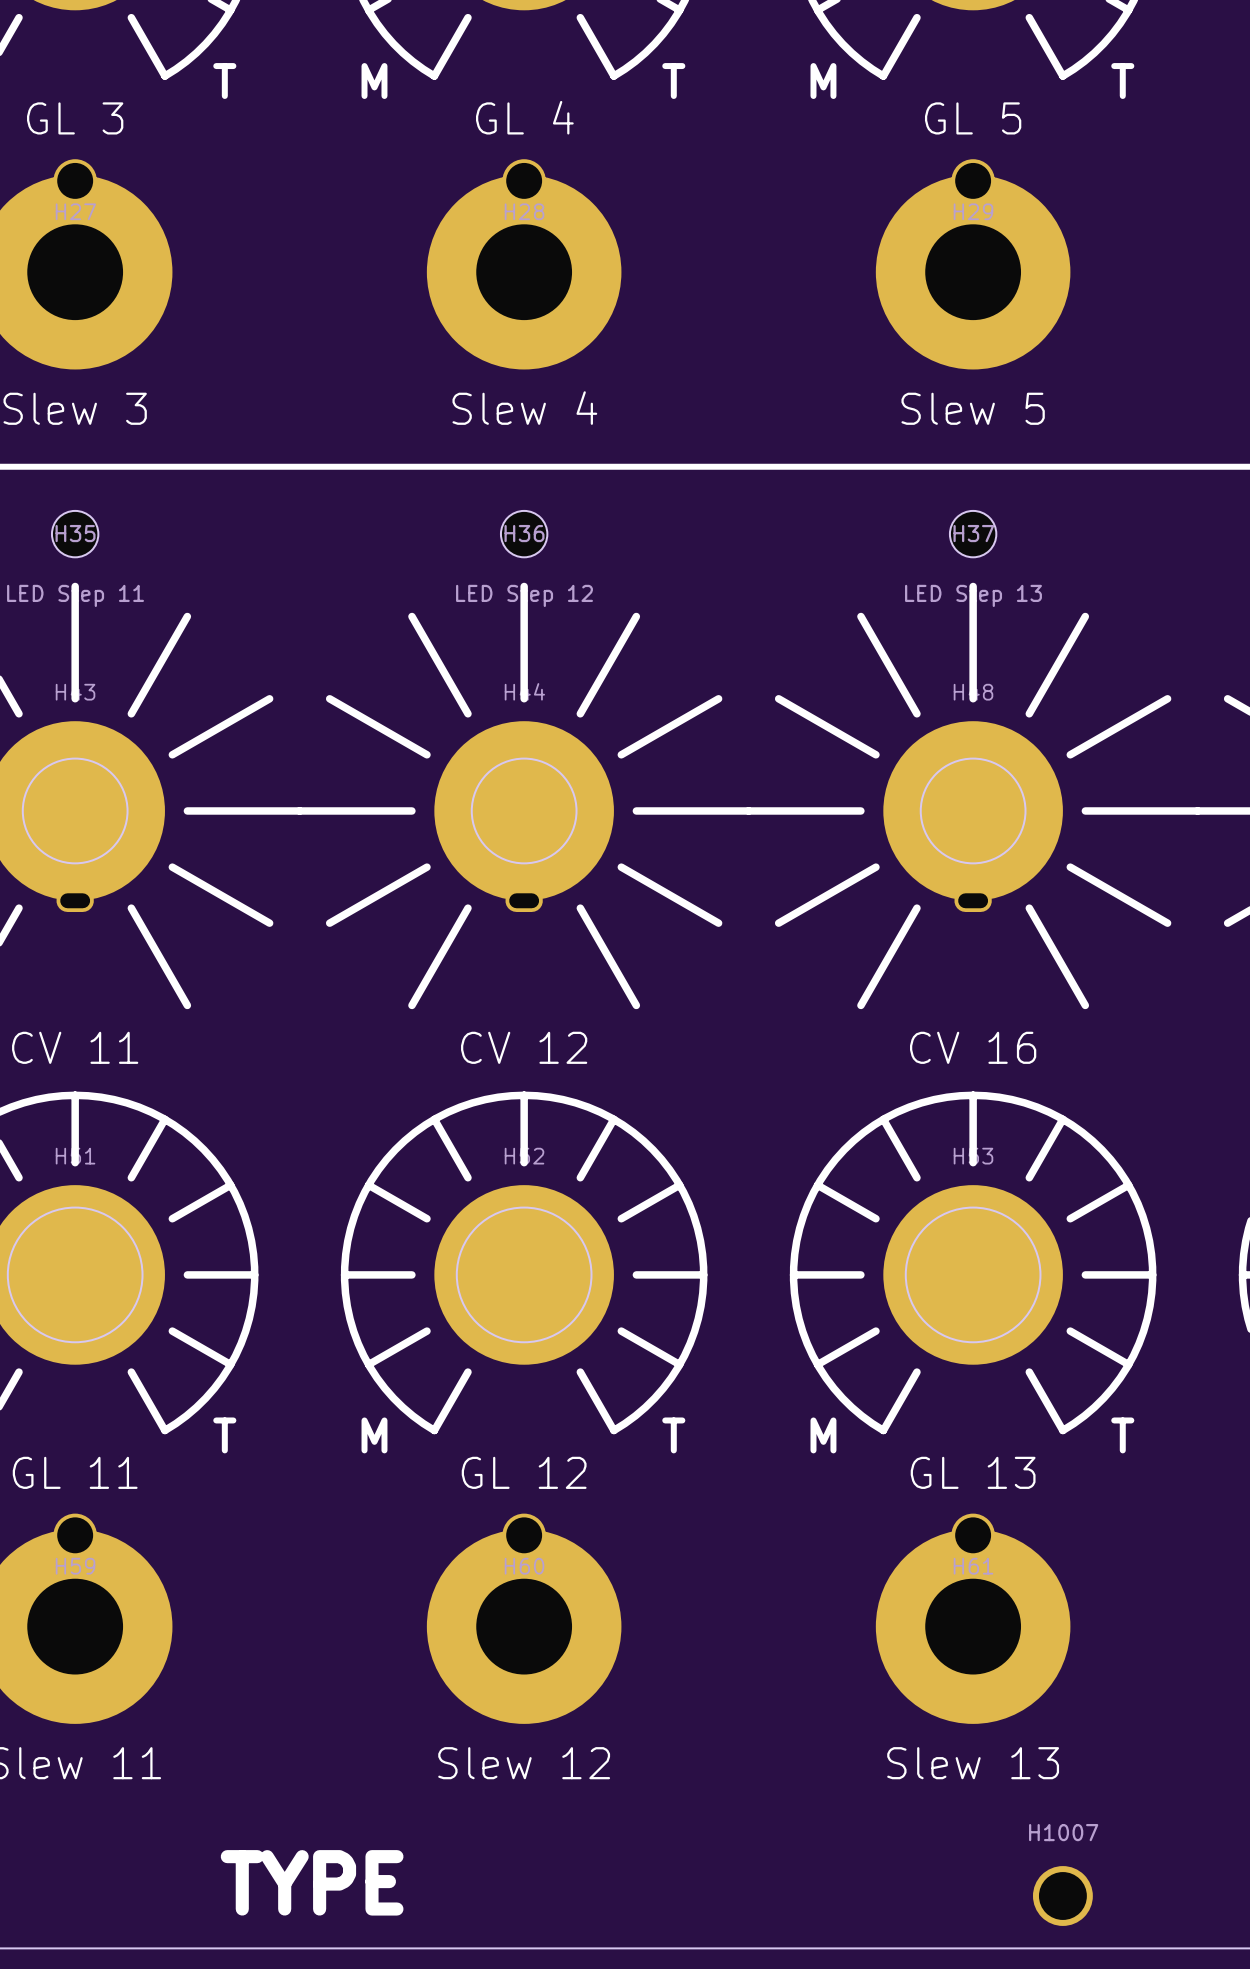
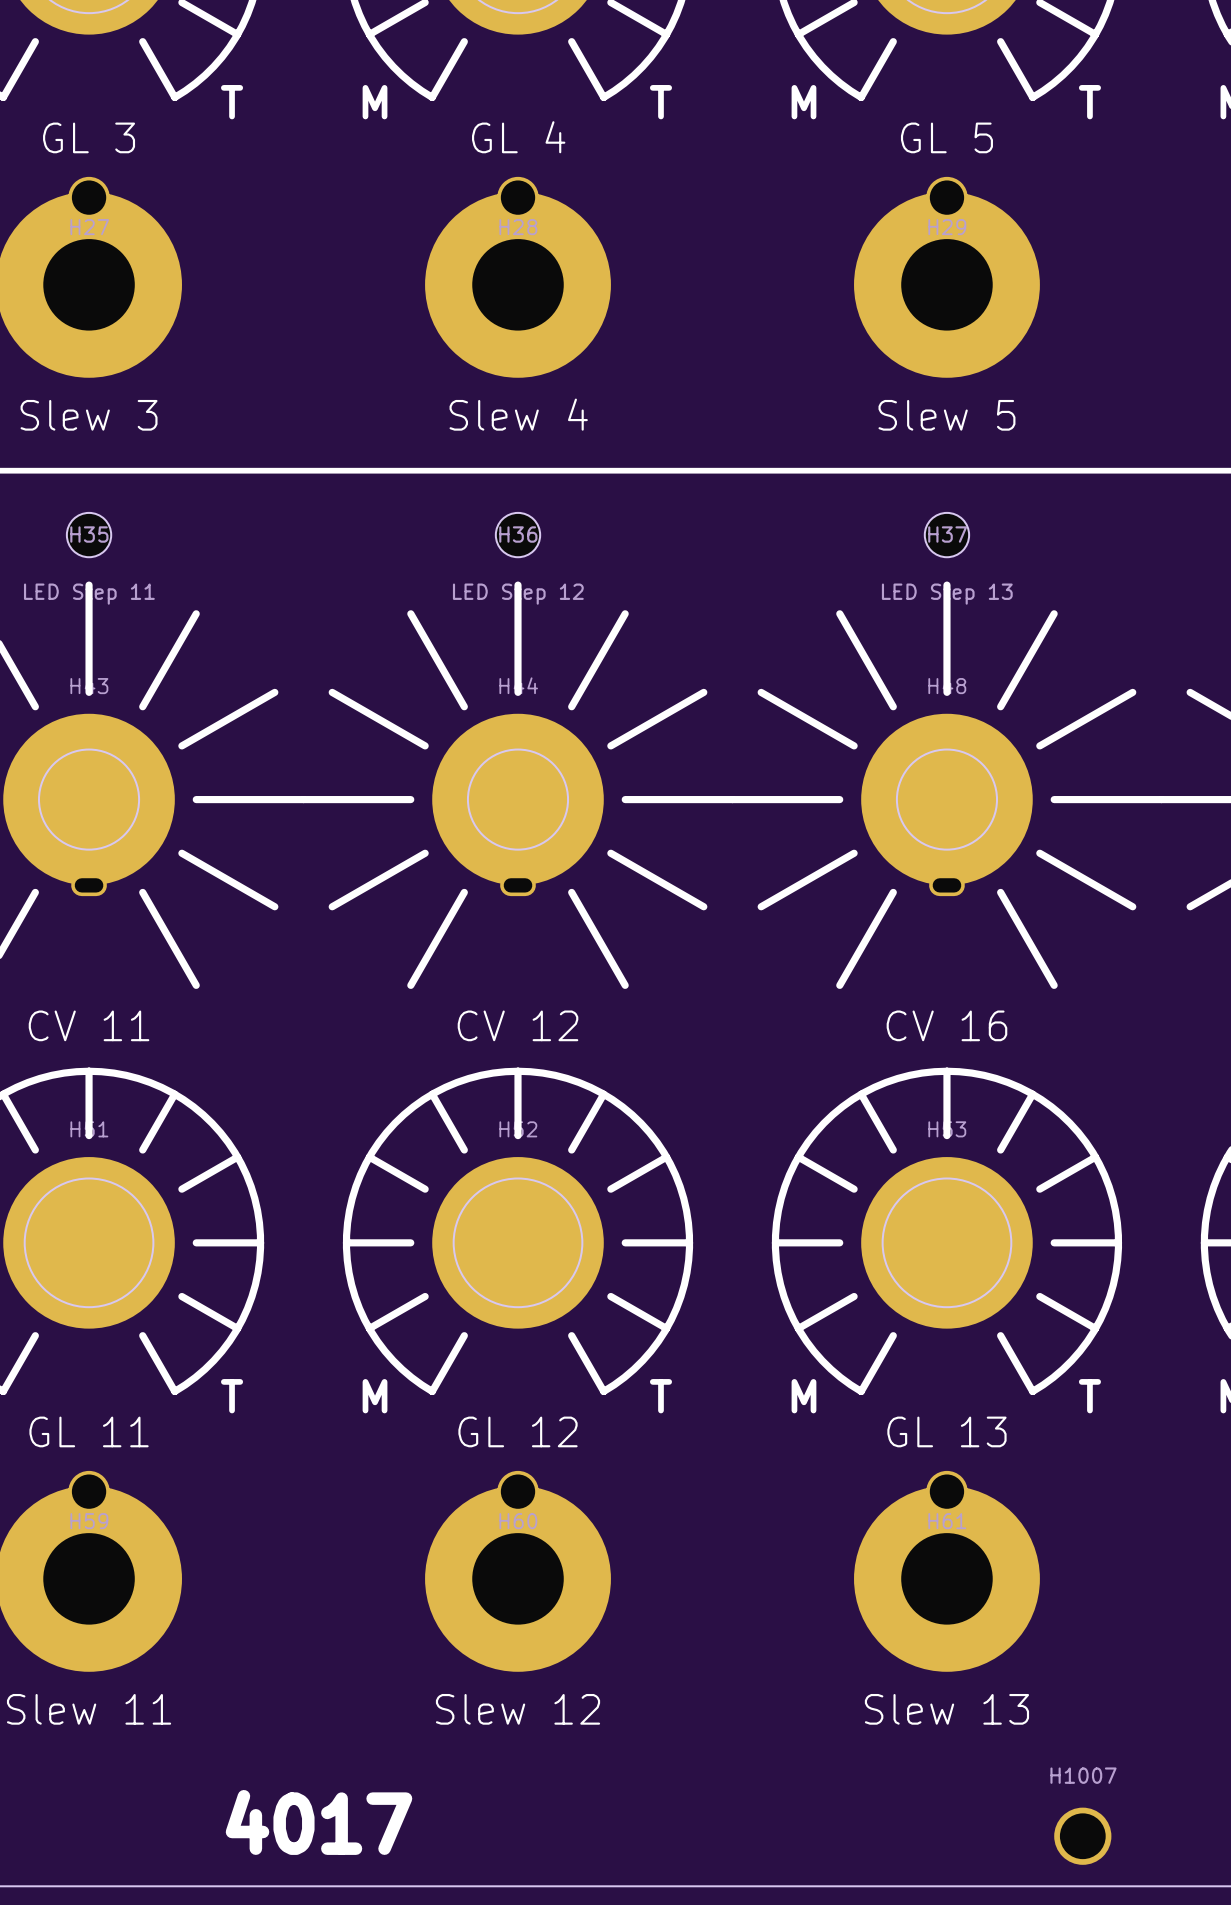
text: TYPE (312, 1882) -> 4017 (319, 1822)
H1007 position: (1062, 1896) -> (1082, 1836)

